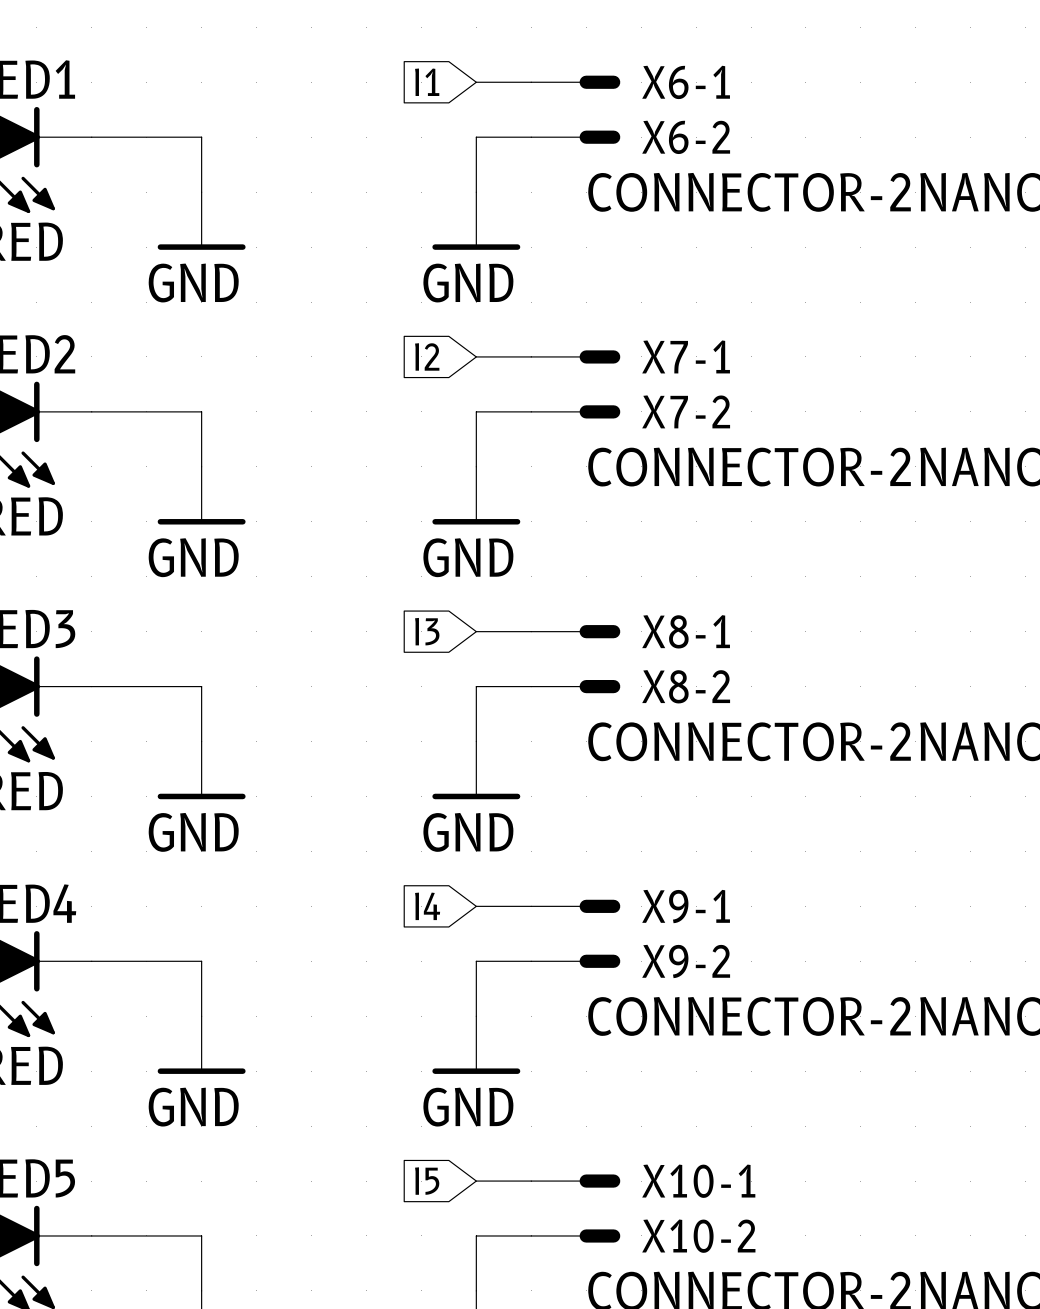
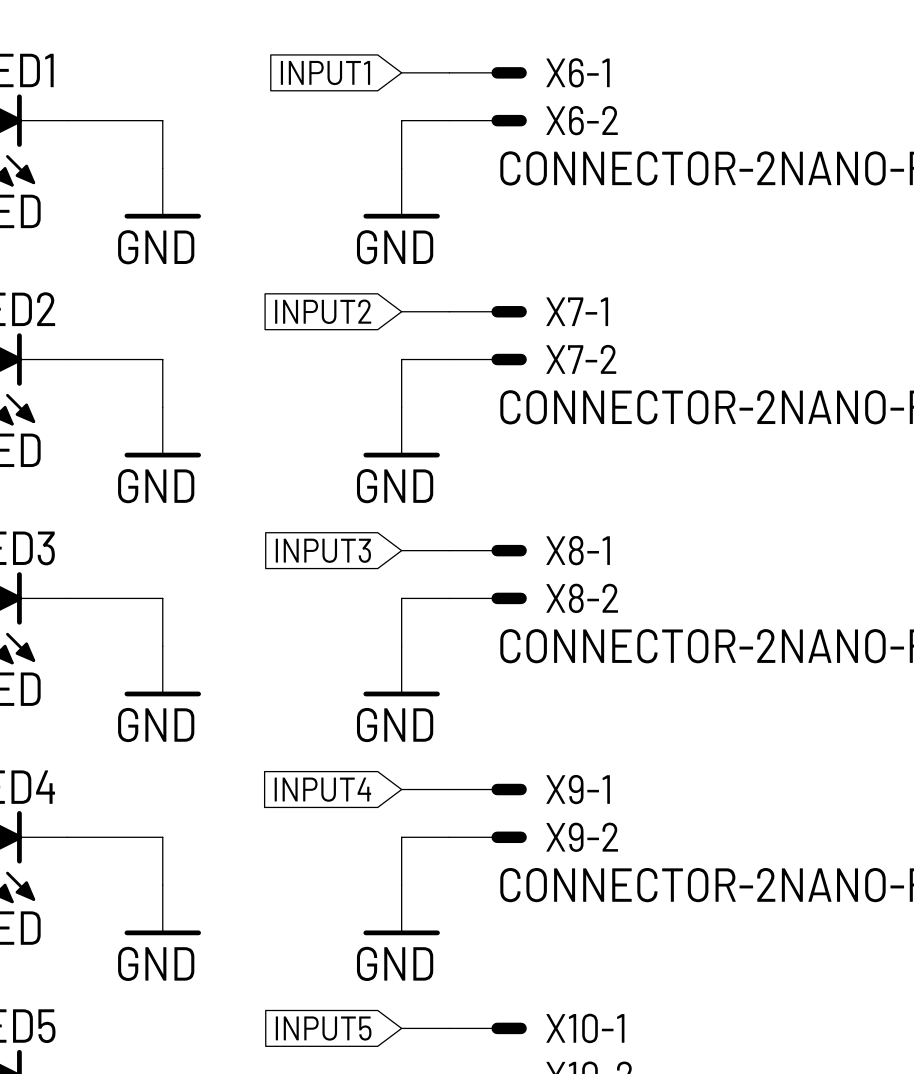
global label: I1 (427, 82) -> INPUT1 (325, 72)
global label: I2 (427, 356) -> INPUT2 (323, 311)
global label: I3 (427, 631) -> INPUT3 (323, 550)
global label: I4 (427, 906) -> INPUT4 (322, 789)
global label: I5 (427, 1181) -> INPUT5 (323, 1028)

